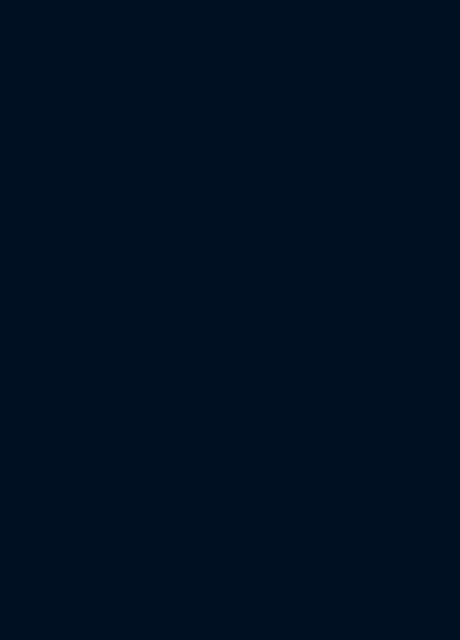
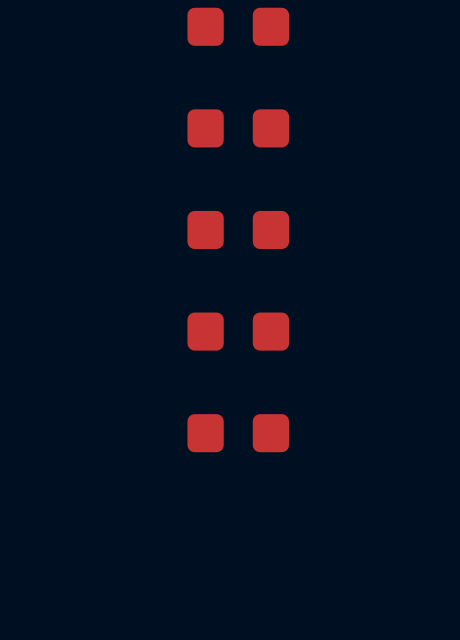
part: none -> (238, 26)
part: none -> (238, 128)
part: none -> (238, 229)
part: none -> (238, 331)
part: none -> (238, 433)

